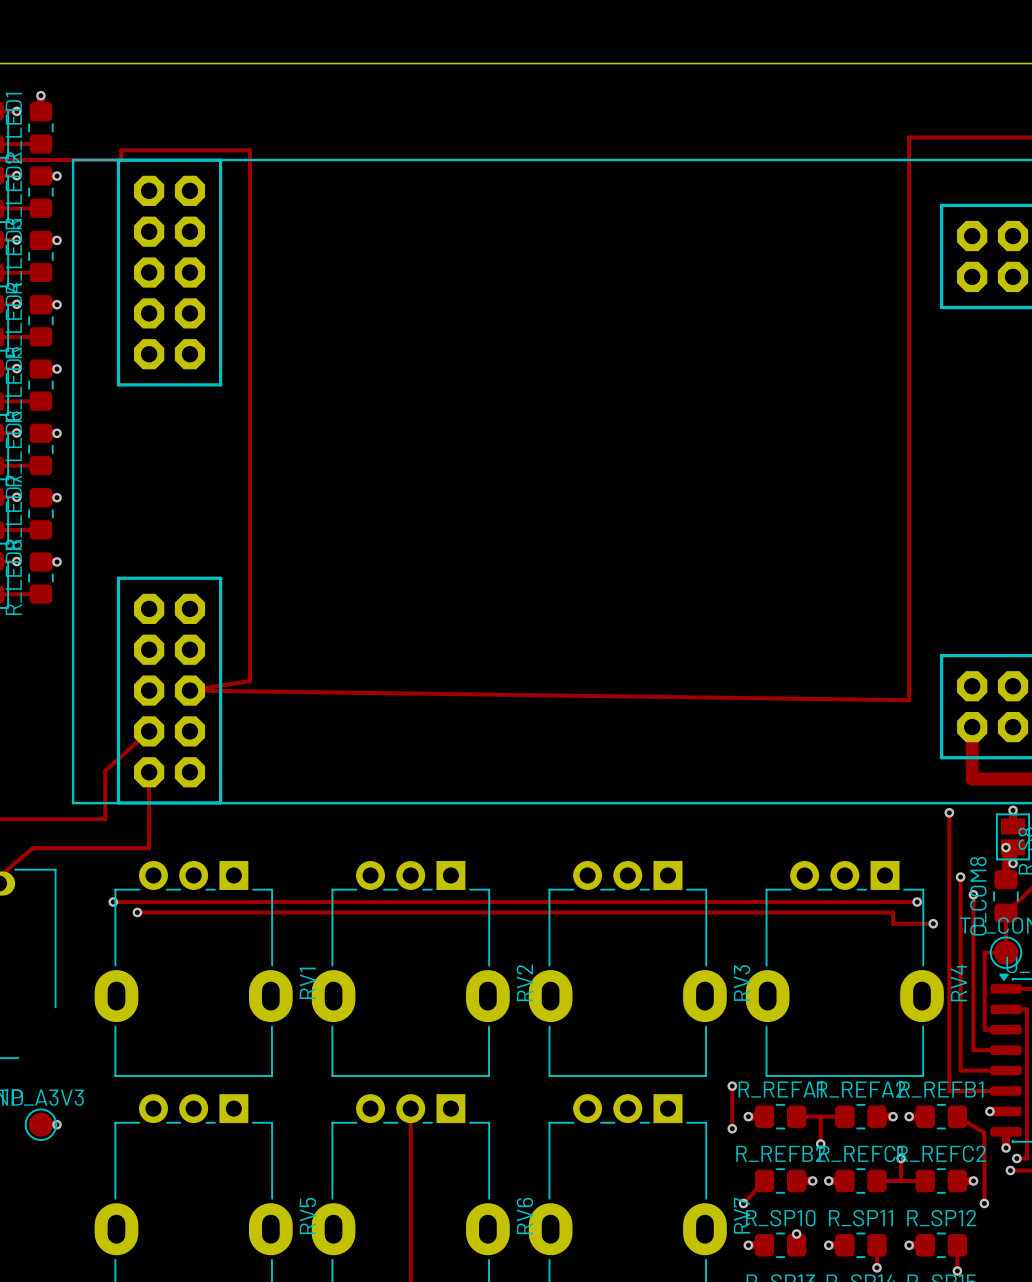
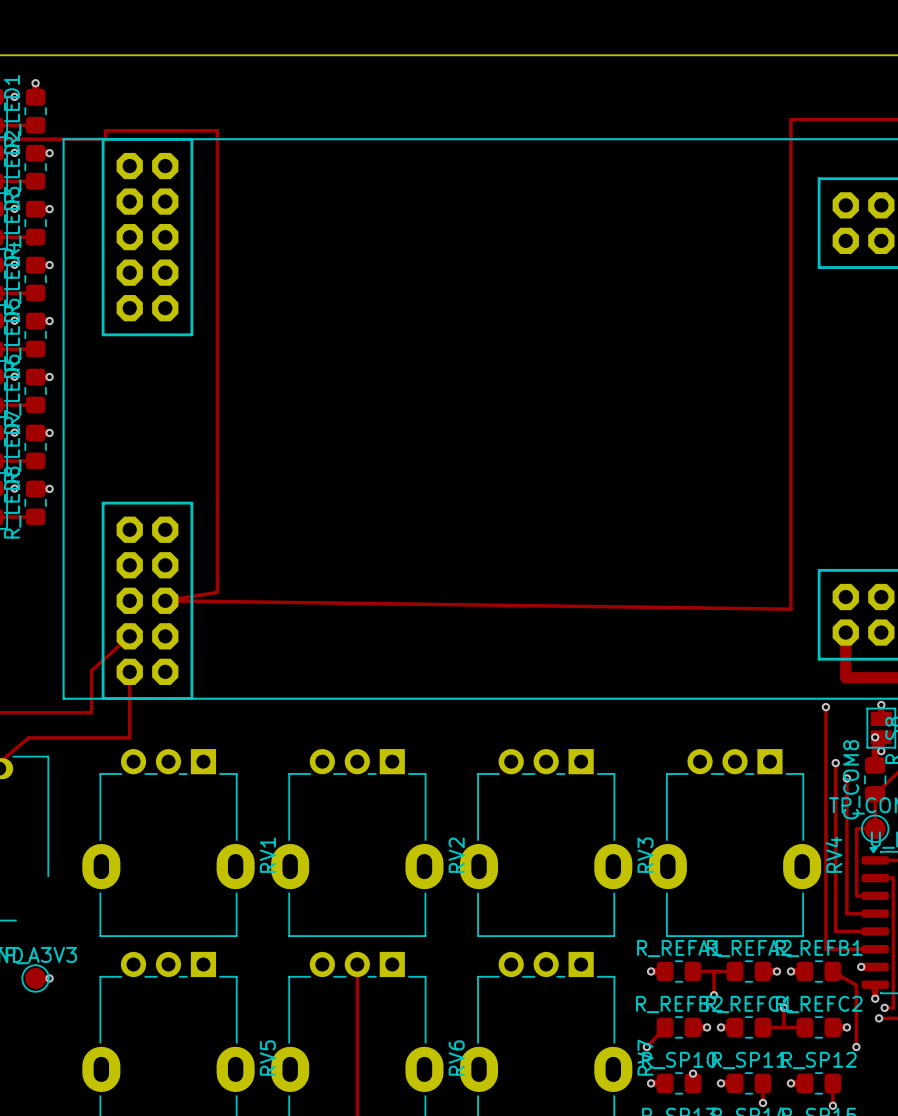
track: (113, 902) (917, 902) -> none
via: (113, 902) -> none
via: (917, 902) -> none
track: (137, 912) (893, 912) (893, 923) (933, 923) -> none
via: (137, 912) -> none
via: (933, 923) -> none
track: (732, 1086) (732, 1128) -> none
via: (732, 1086) -> none
via: (732, 1128) -> none

